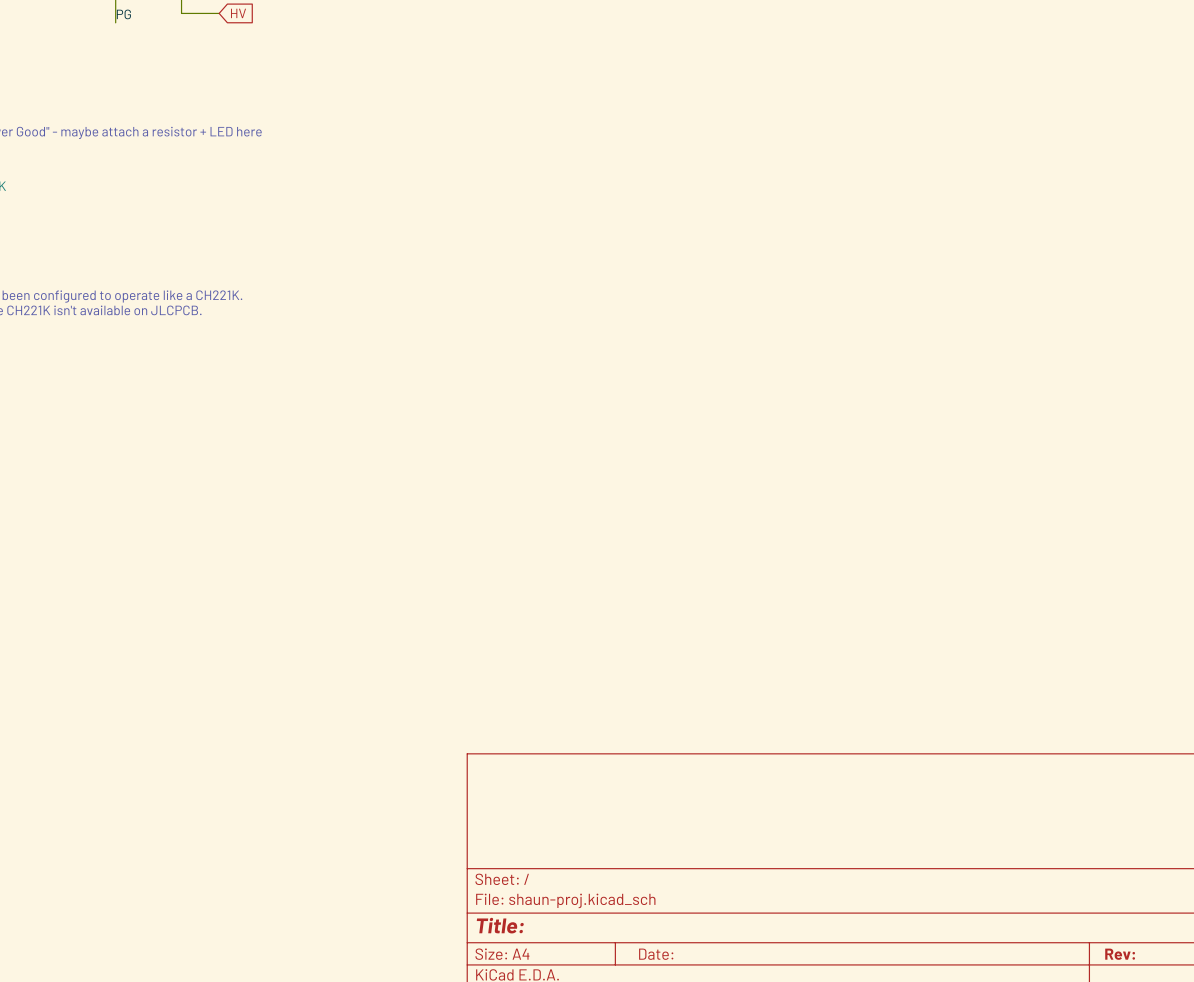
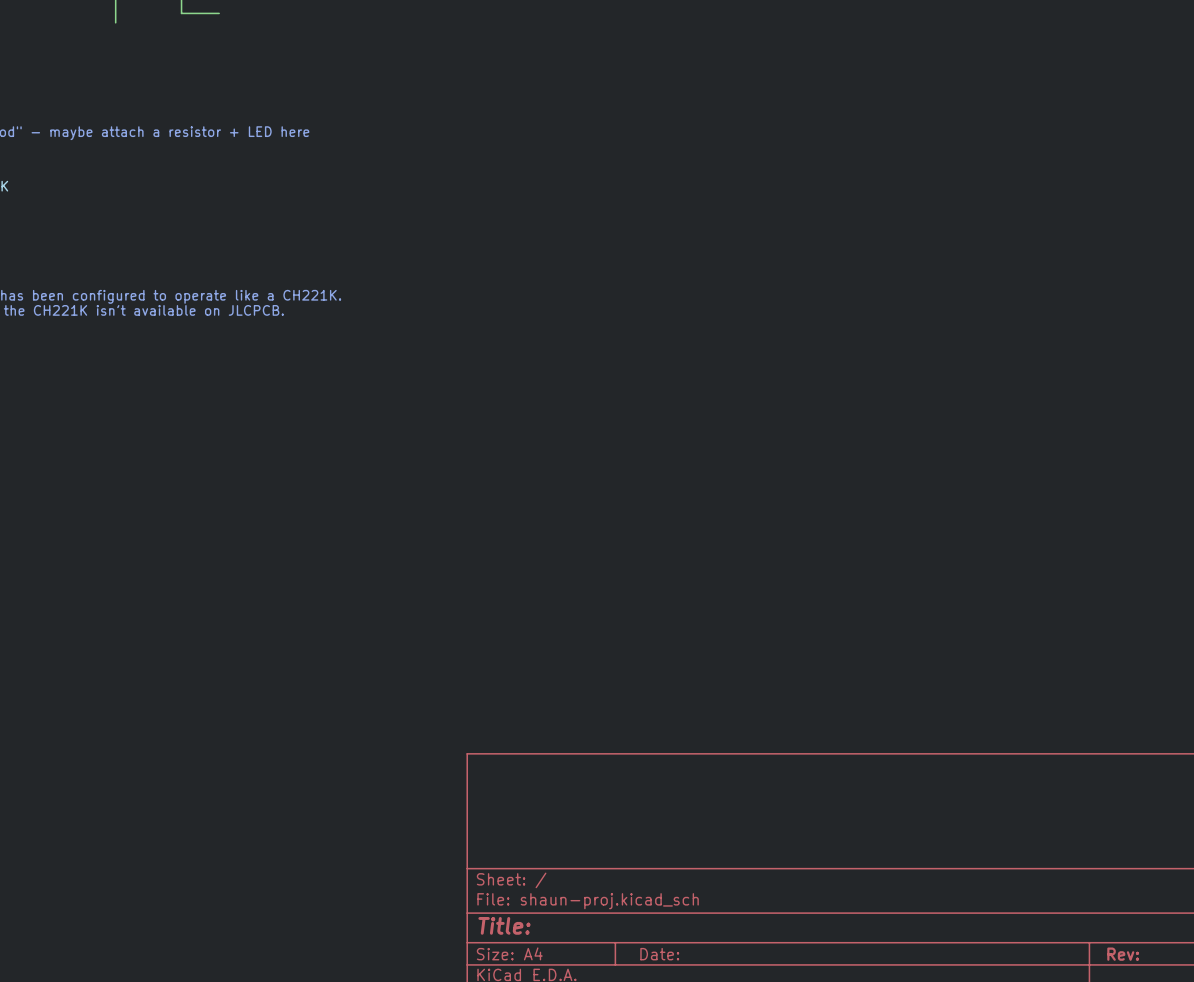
global label: HV (238, 13) -> none
label: PG (123, 14) -> none

